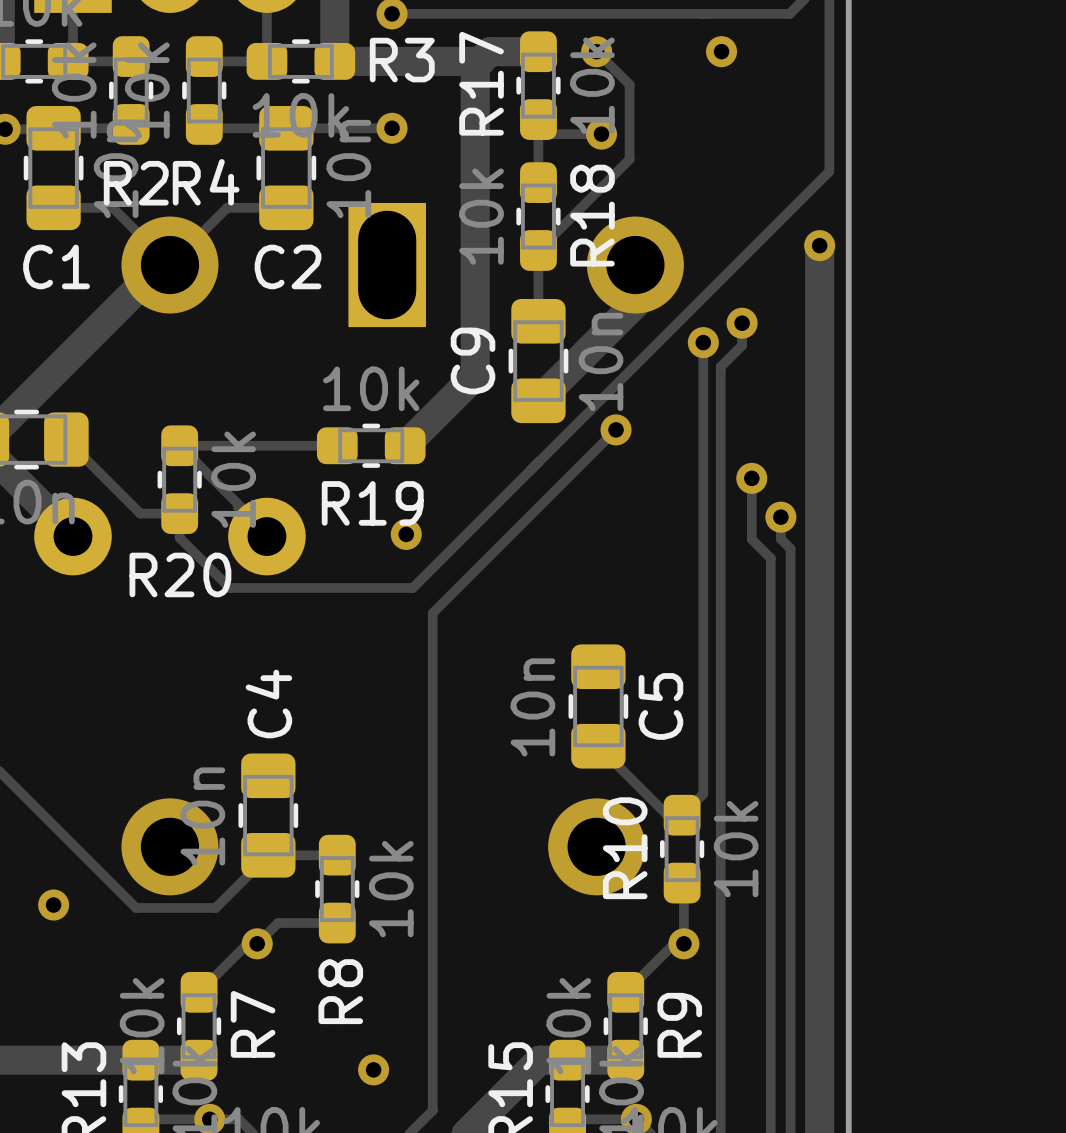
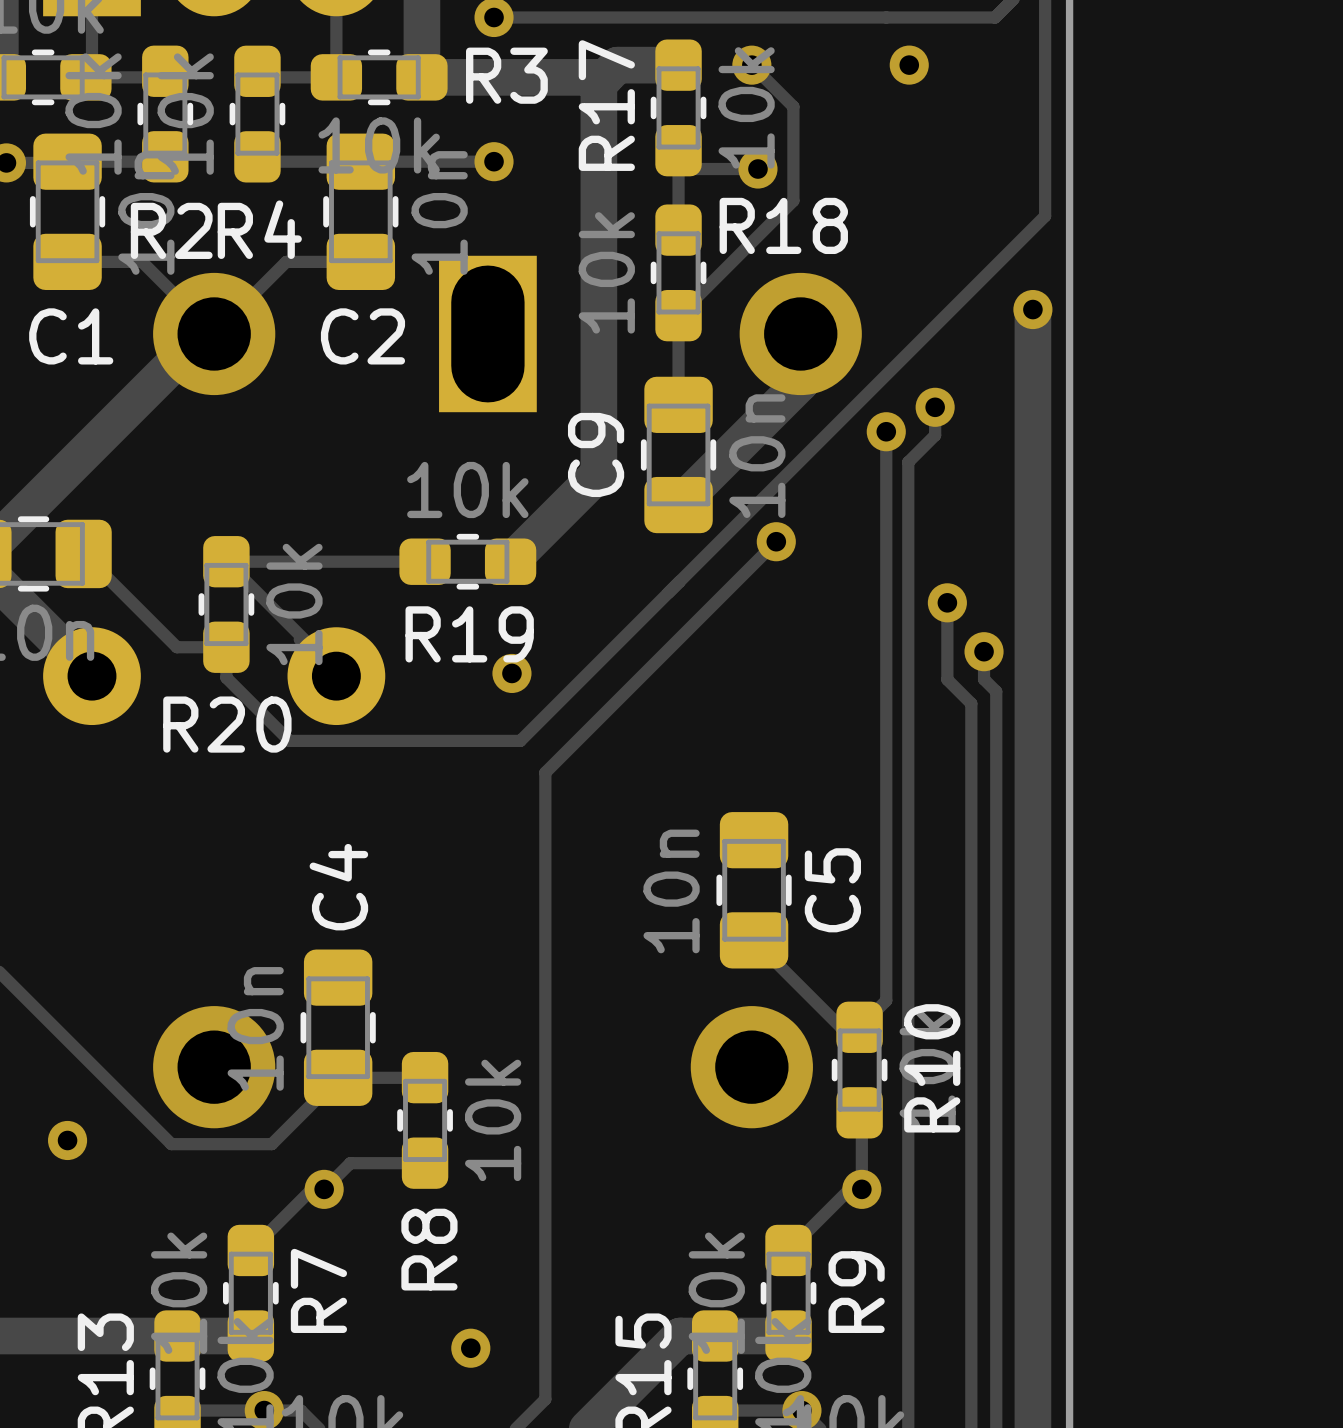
R18 name rotation: 0° (592, 215) -> 90° clockwise (783, 225)
R10 name position: R10 (625, 848) -> R10 (932, 1068)

